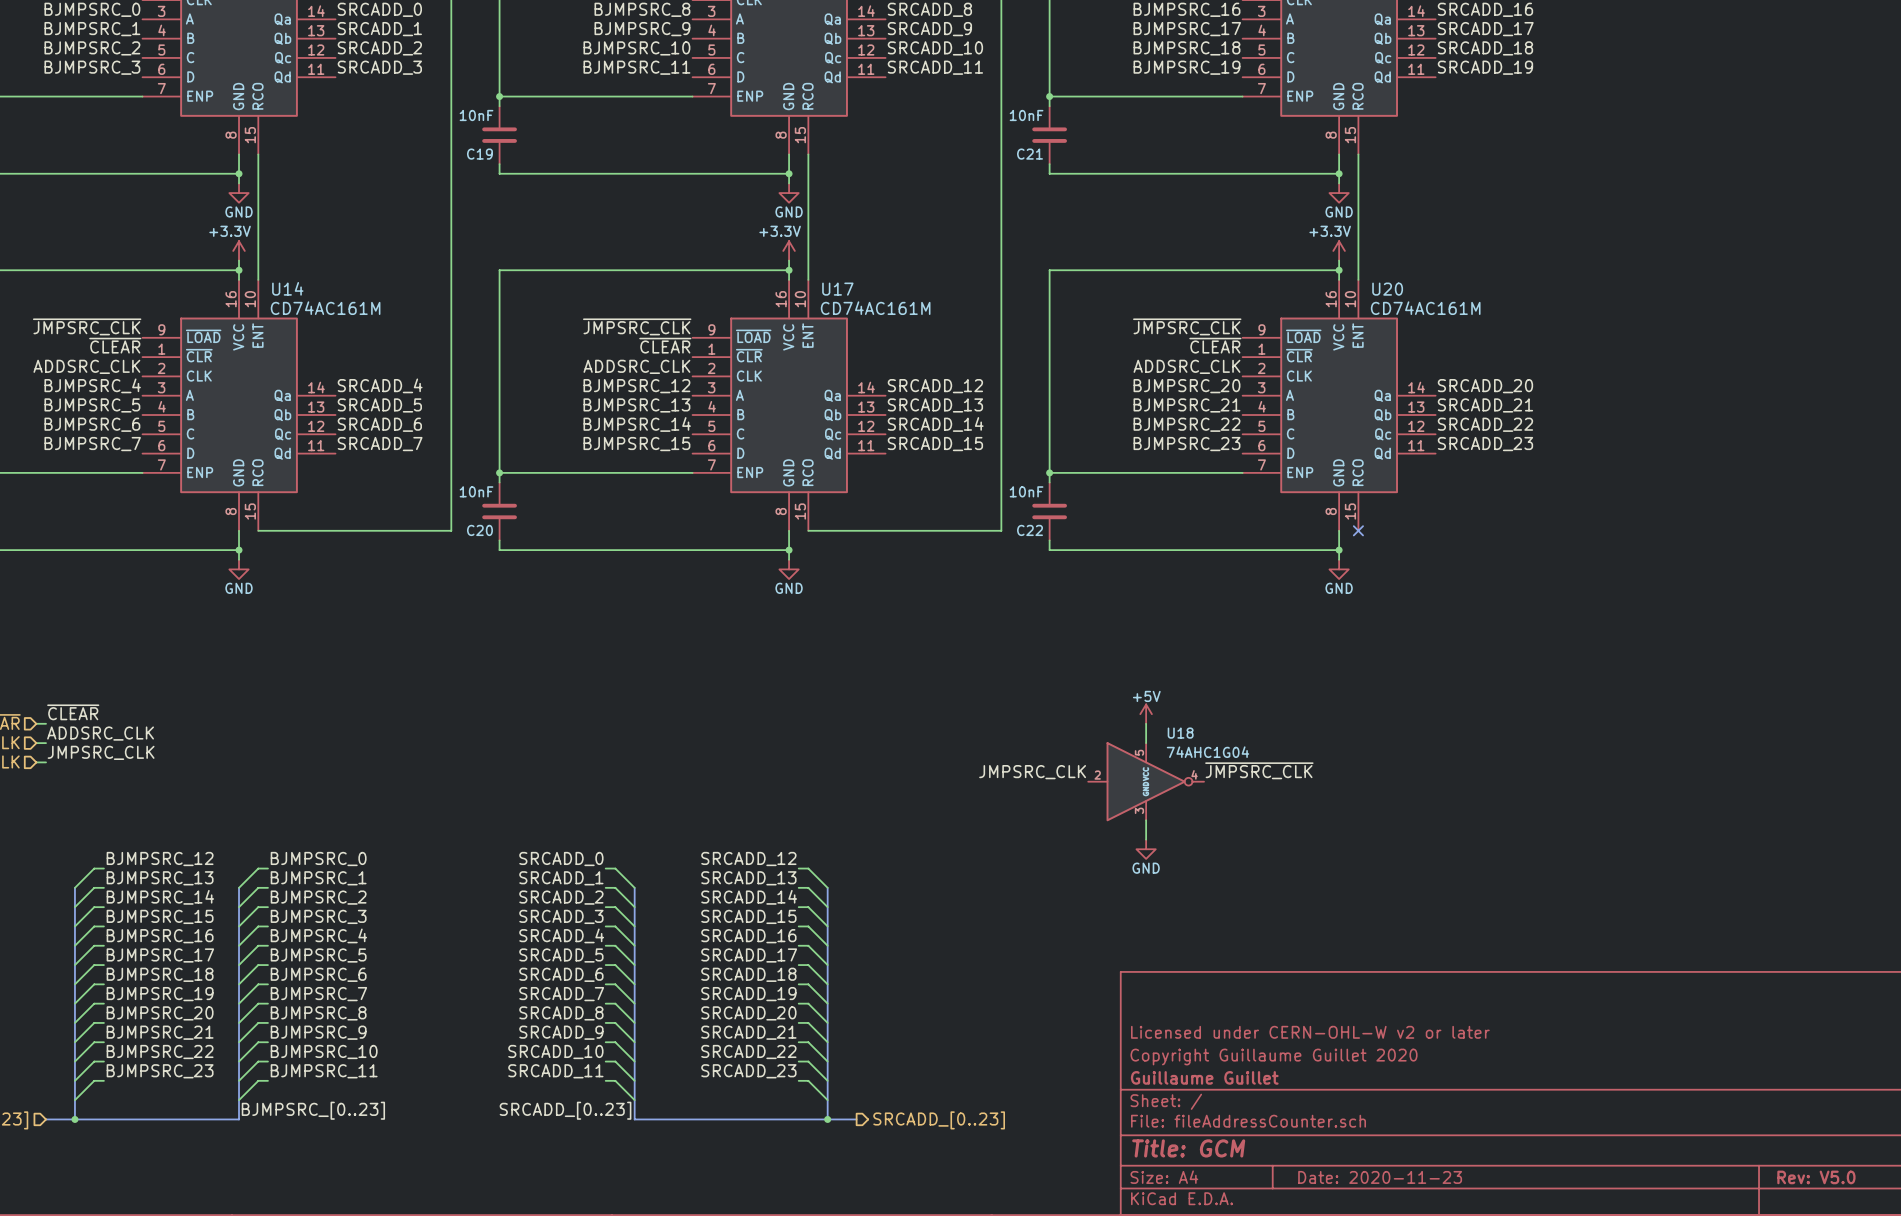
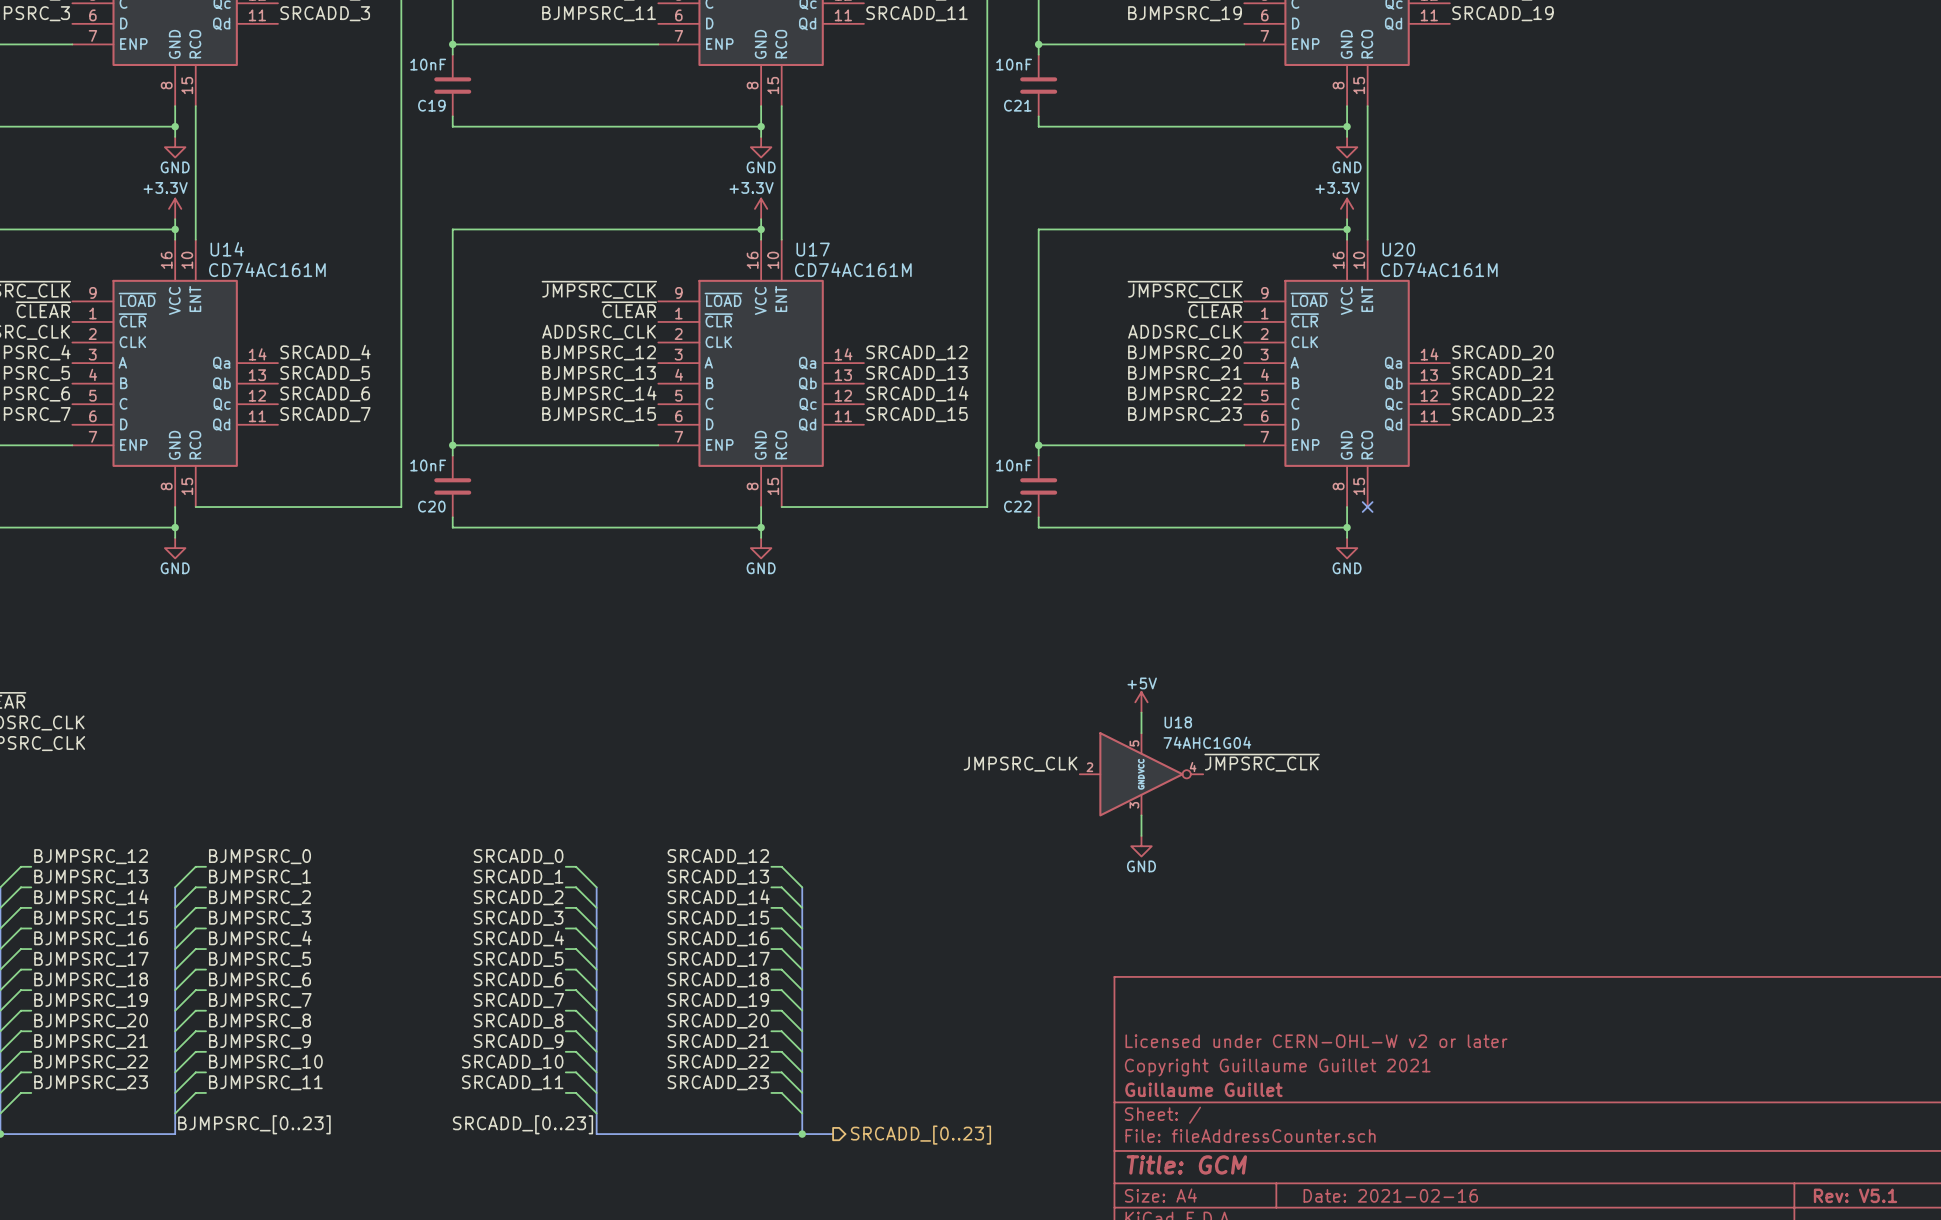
title block: Copyright Guillaume Guillet 2020 (1274, 1057) -> Copyright Guillaume Guillet 2021 (1277, 1067)
title block: Date: 2020-11-23 (1380, 1177) -> Date: 2021-02-16 (1390, 1195)
title block: Rev: V5.0 (1816, 1177) -> Rev: V5.1 (1855, 1195)

